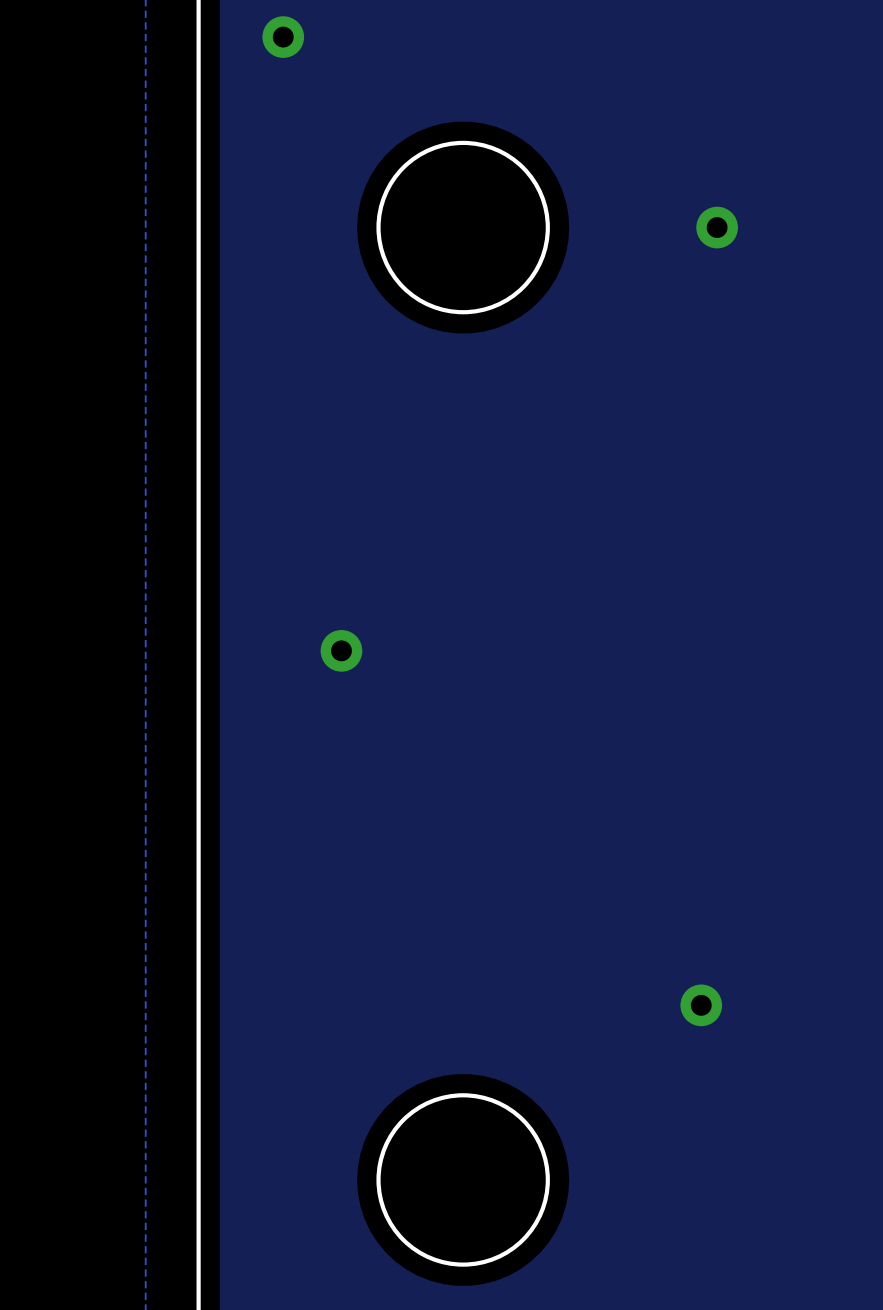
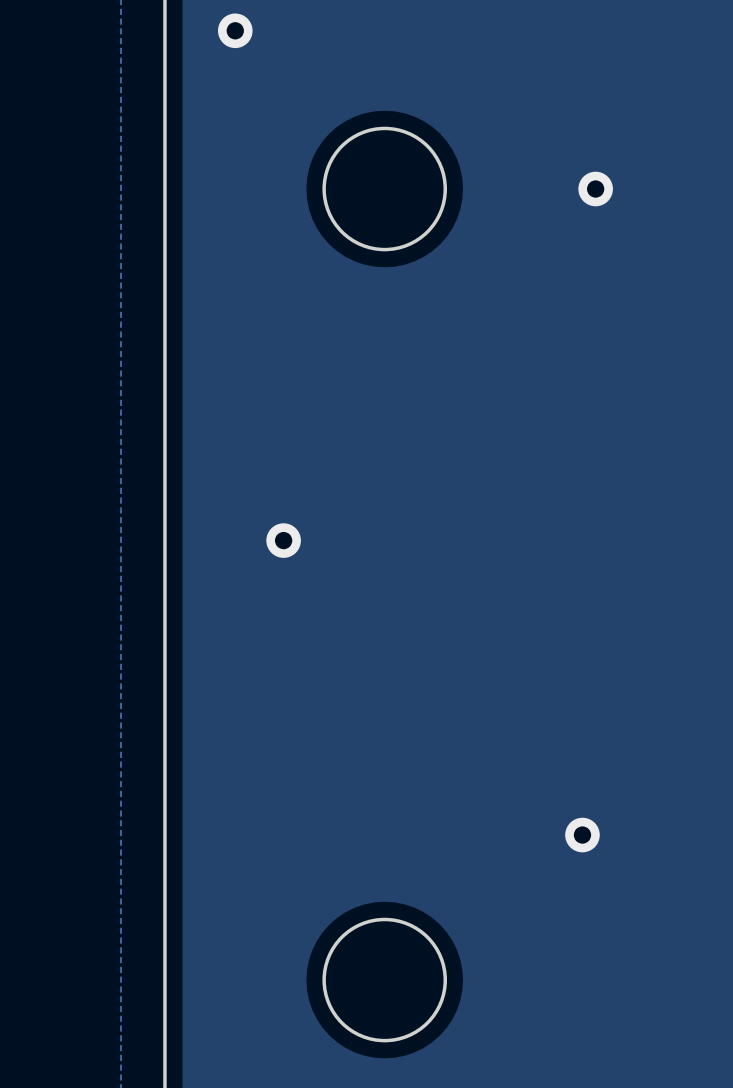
round board edge size: [376, 140, 550, 315] -> [322, 126, 447, 252]
round board edge size: [376, 1093, 550, 1267] -> [322, 917, 447, 1043]

